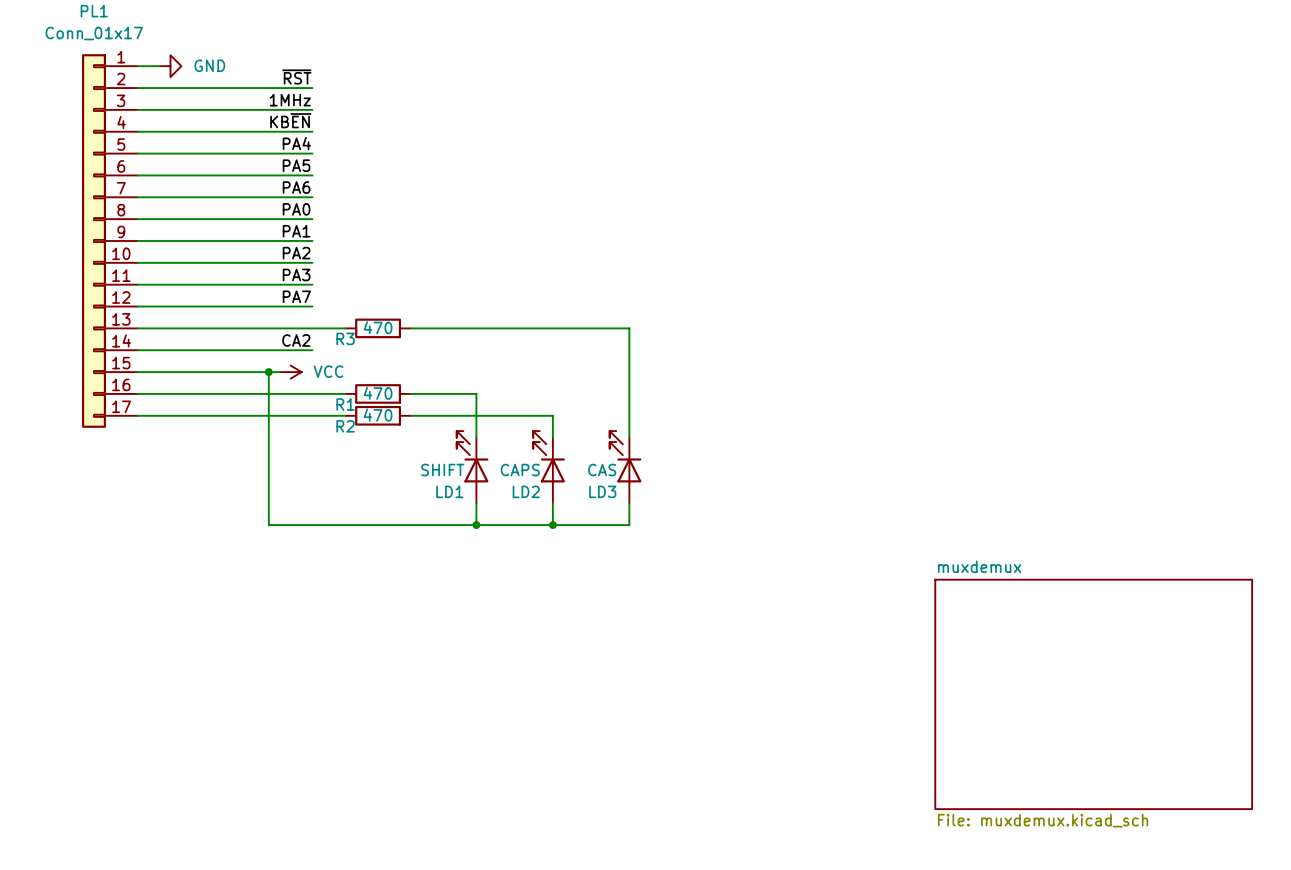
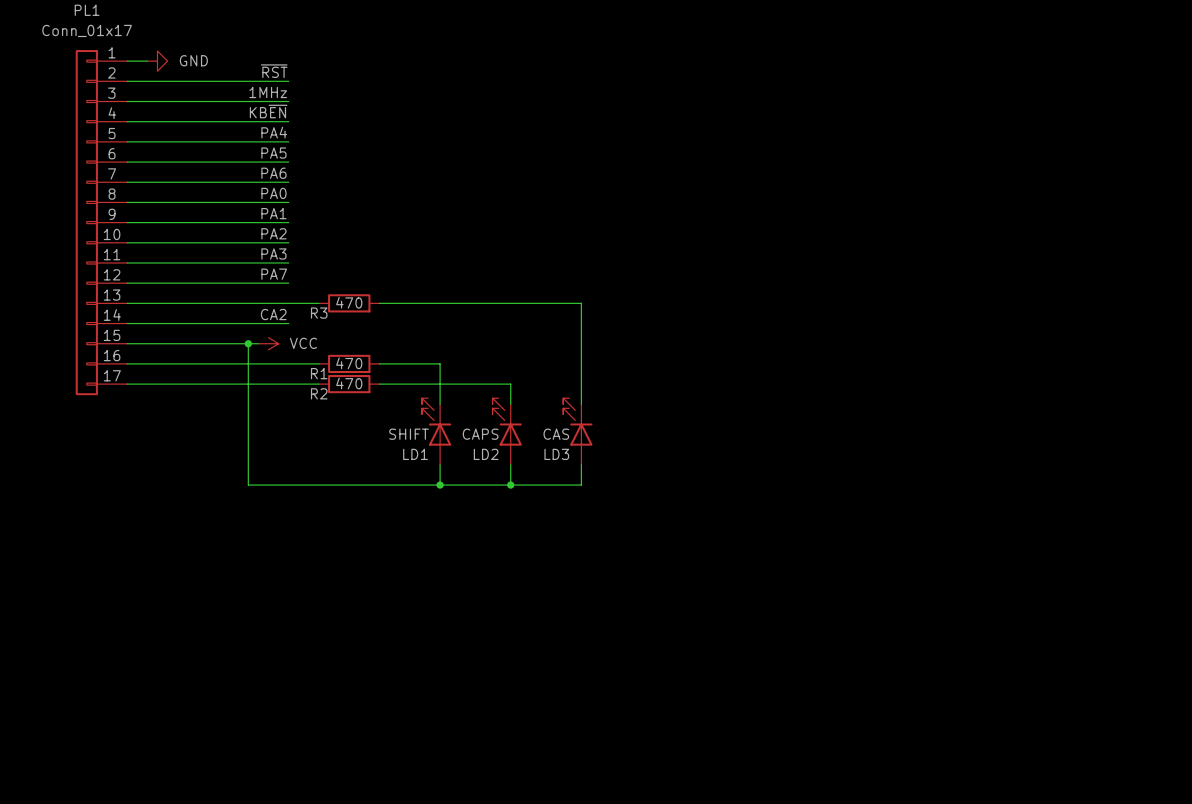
sheet muxdemux: File: muxdemux.kicad_sch (1093, 694) -> none

